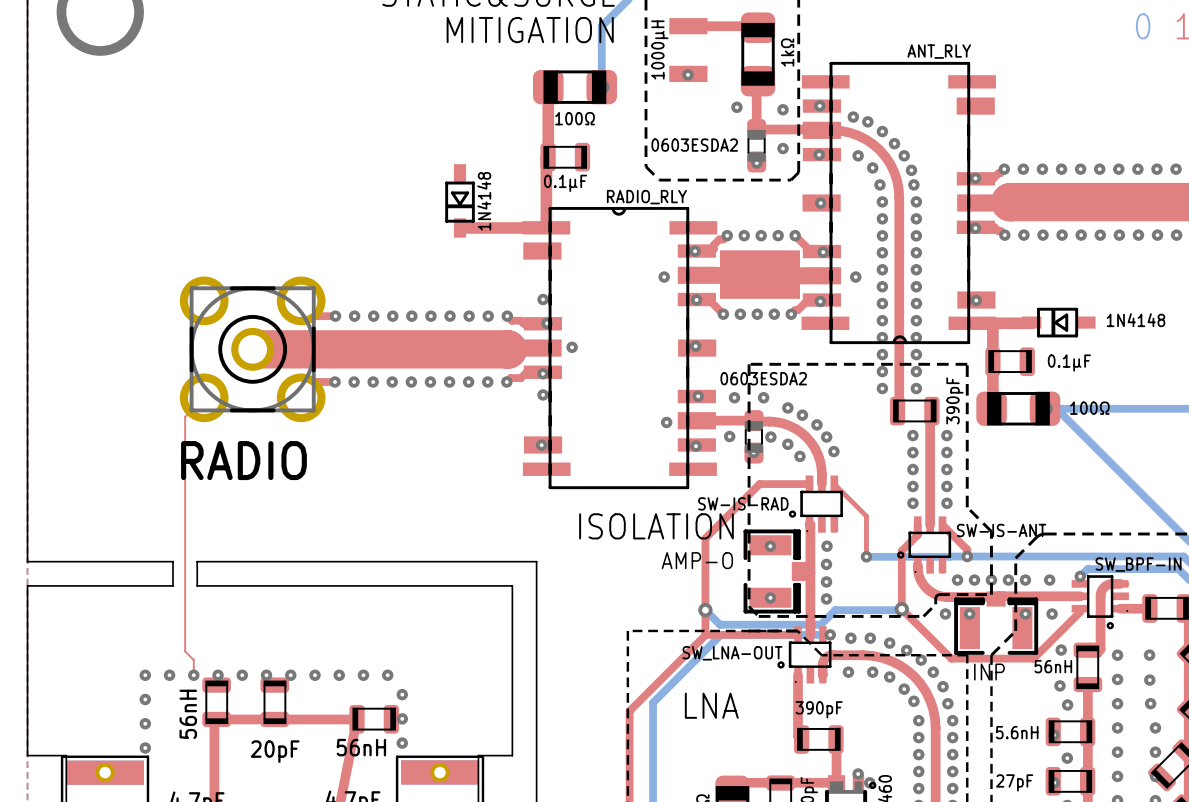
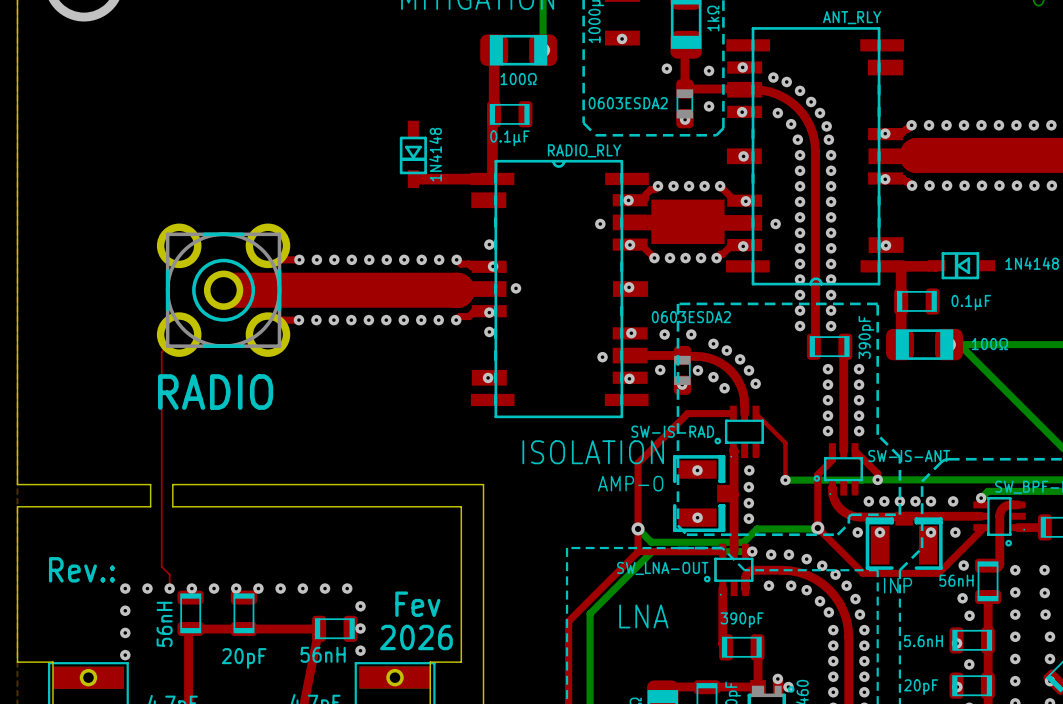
text: none -> Rev.: (81, 569)
text: none -> Fev (417, 604)
text: none -> 2026 (416, 637)
part value: 27pF (1014, 782) -> 20pF (921, 687)

